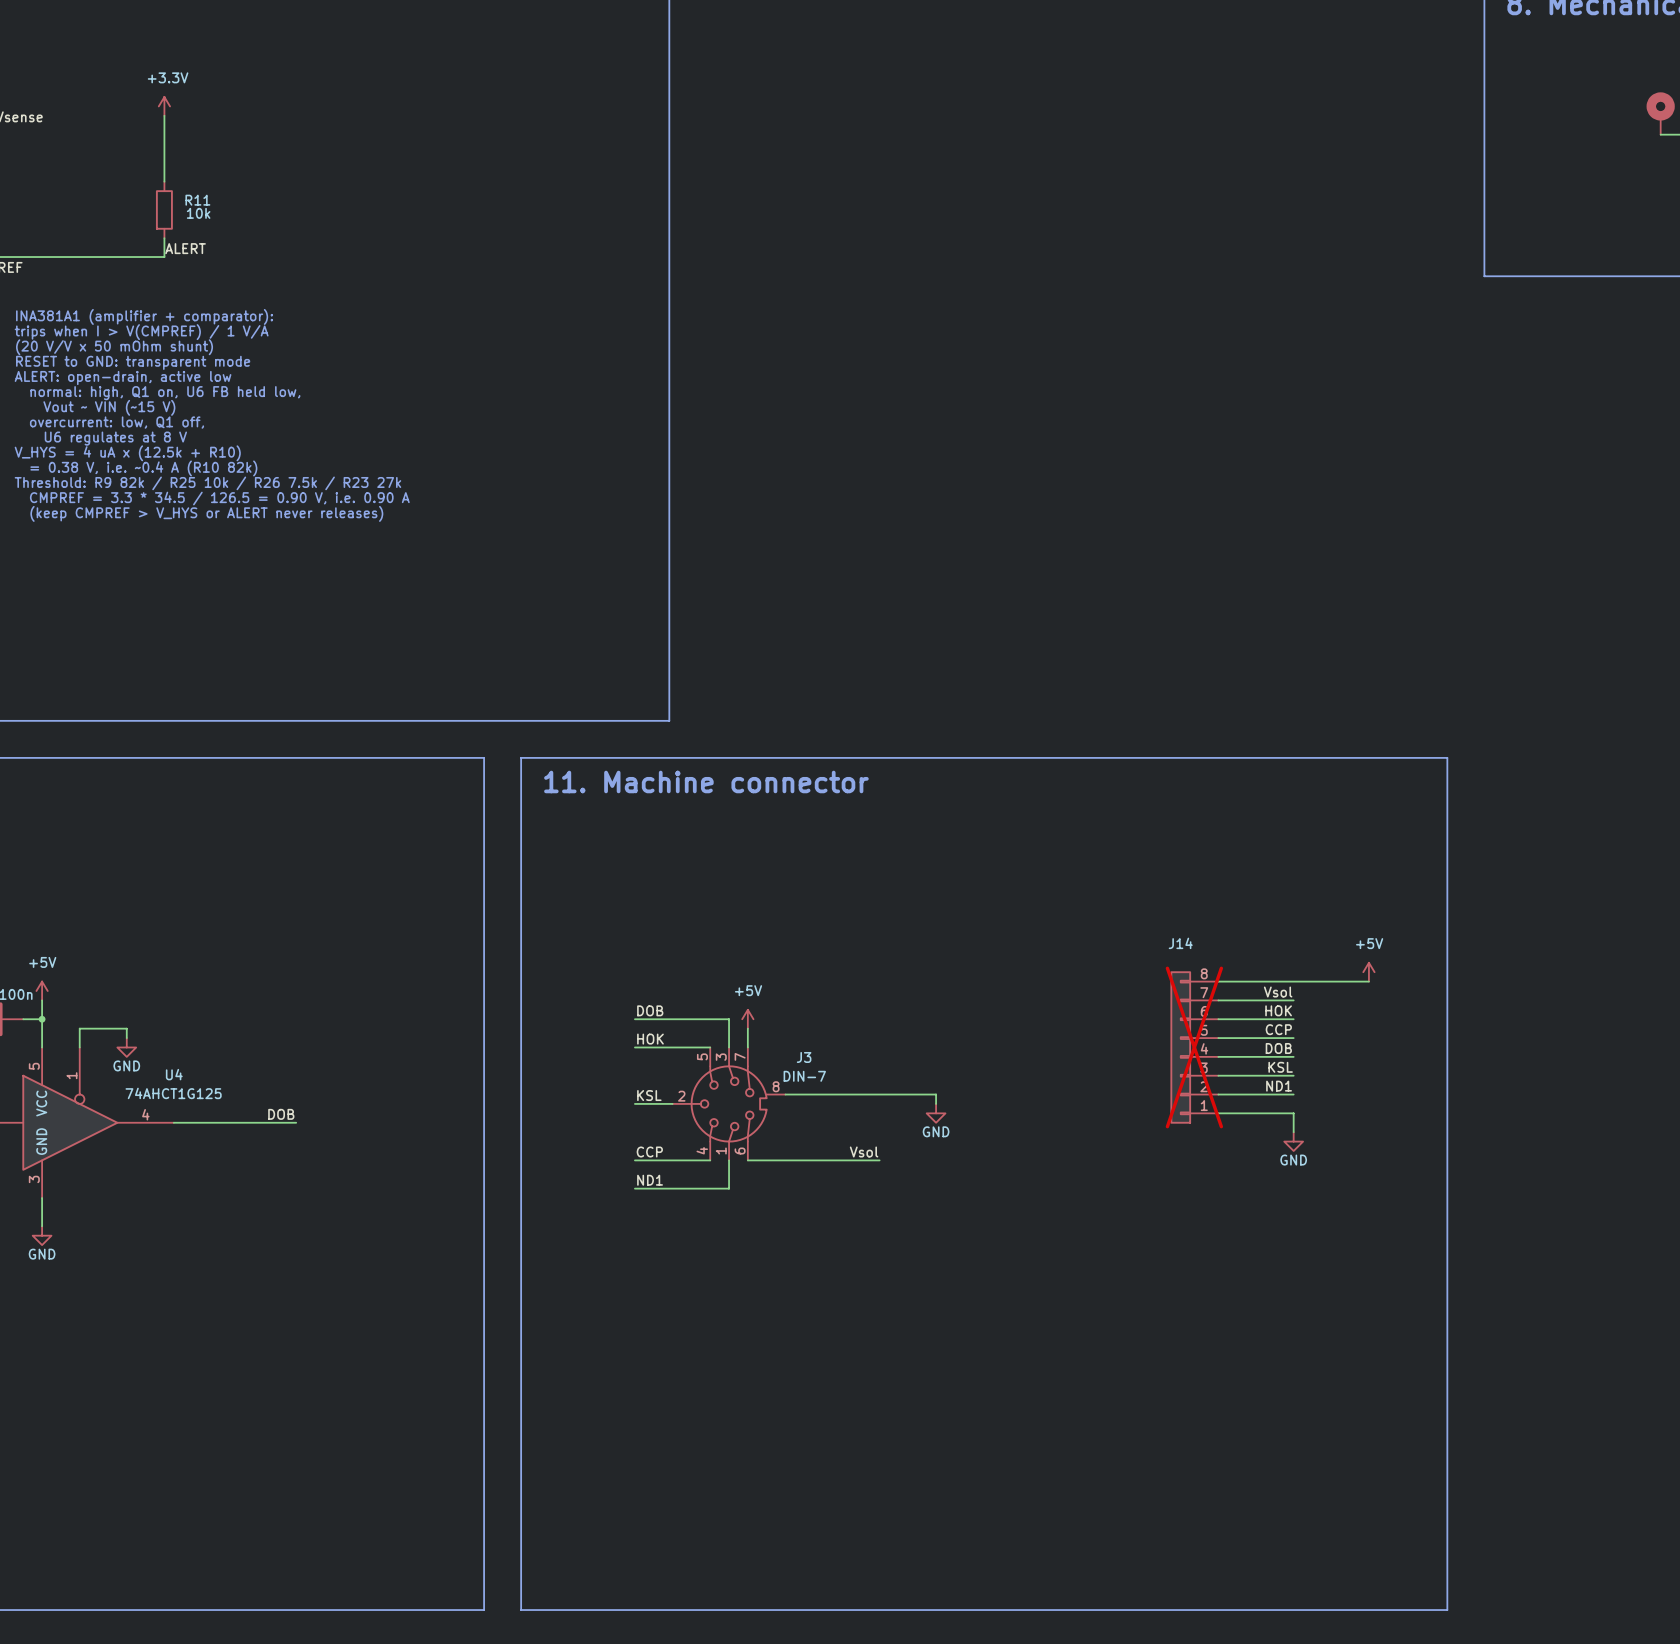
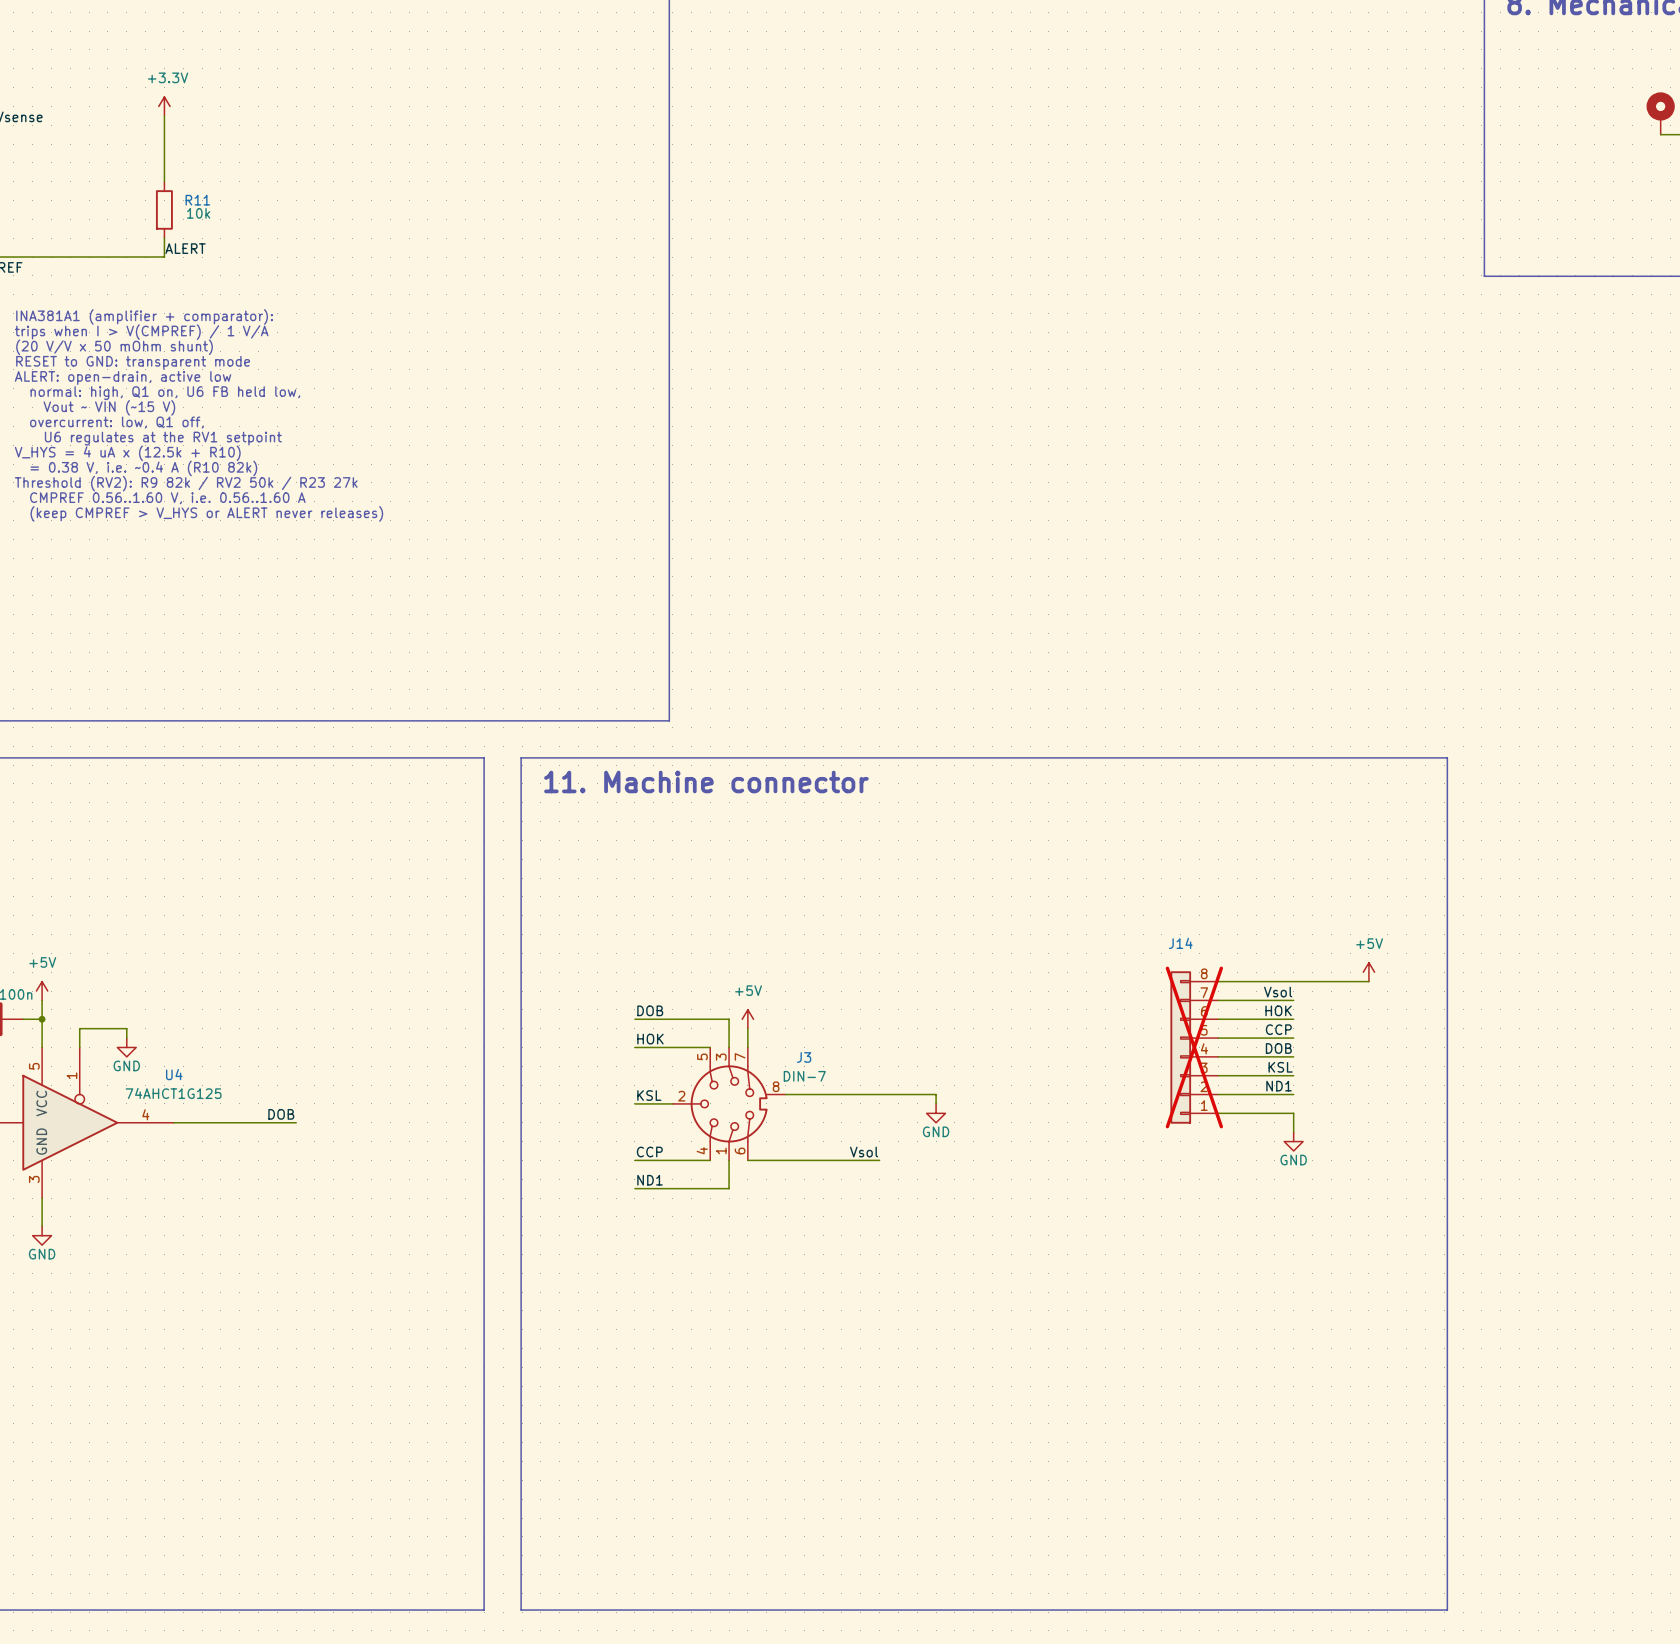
text: U6 regulates at 8 V (115, 438) -> U6 regulates at the RV1 setpoint (163, 438)
text: Threshold: R9 82k / R25 10k / R26 7.5k / R23 27k (207, 483) -> Threshold (RV2): R9 82k / RV2 50k / R23 27k (186, 483)
text: CMPREF = 3.3 * 34.5 / 126.5 = 0.90 V, i.e. 0.90 A (219, 498) -> CMPREF 0.56..1.60 V, i.e. 0.56..1.60 A (167, 498)

